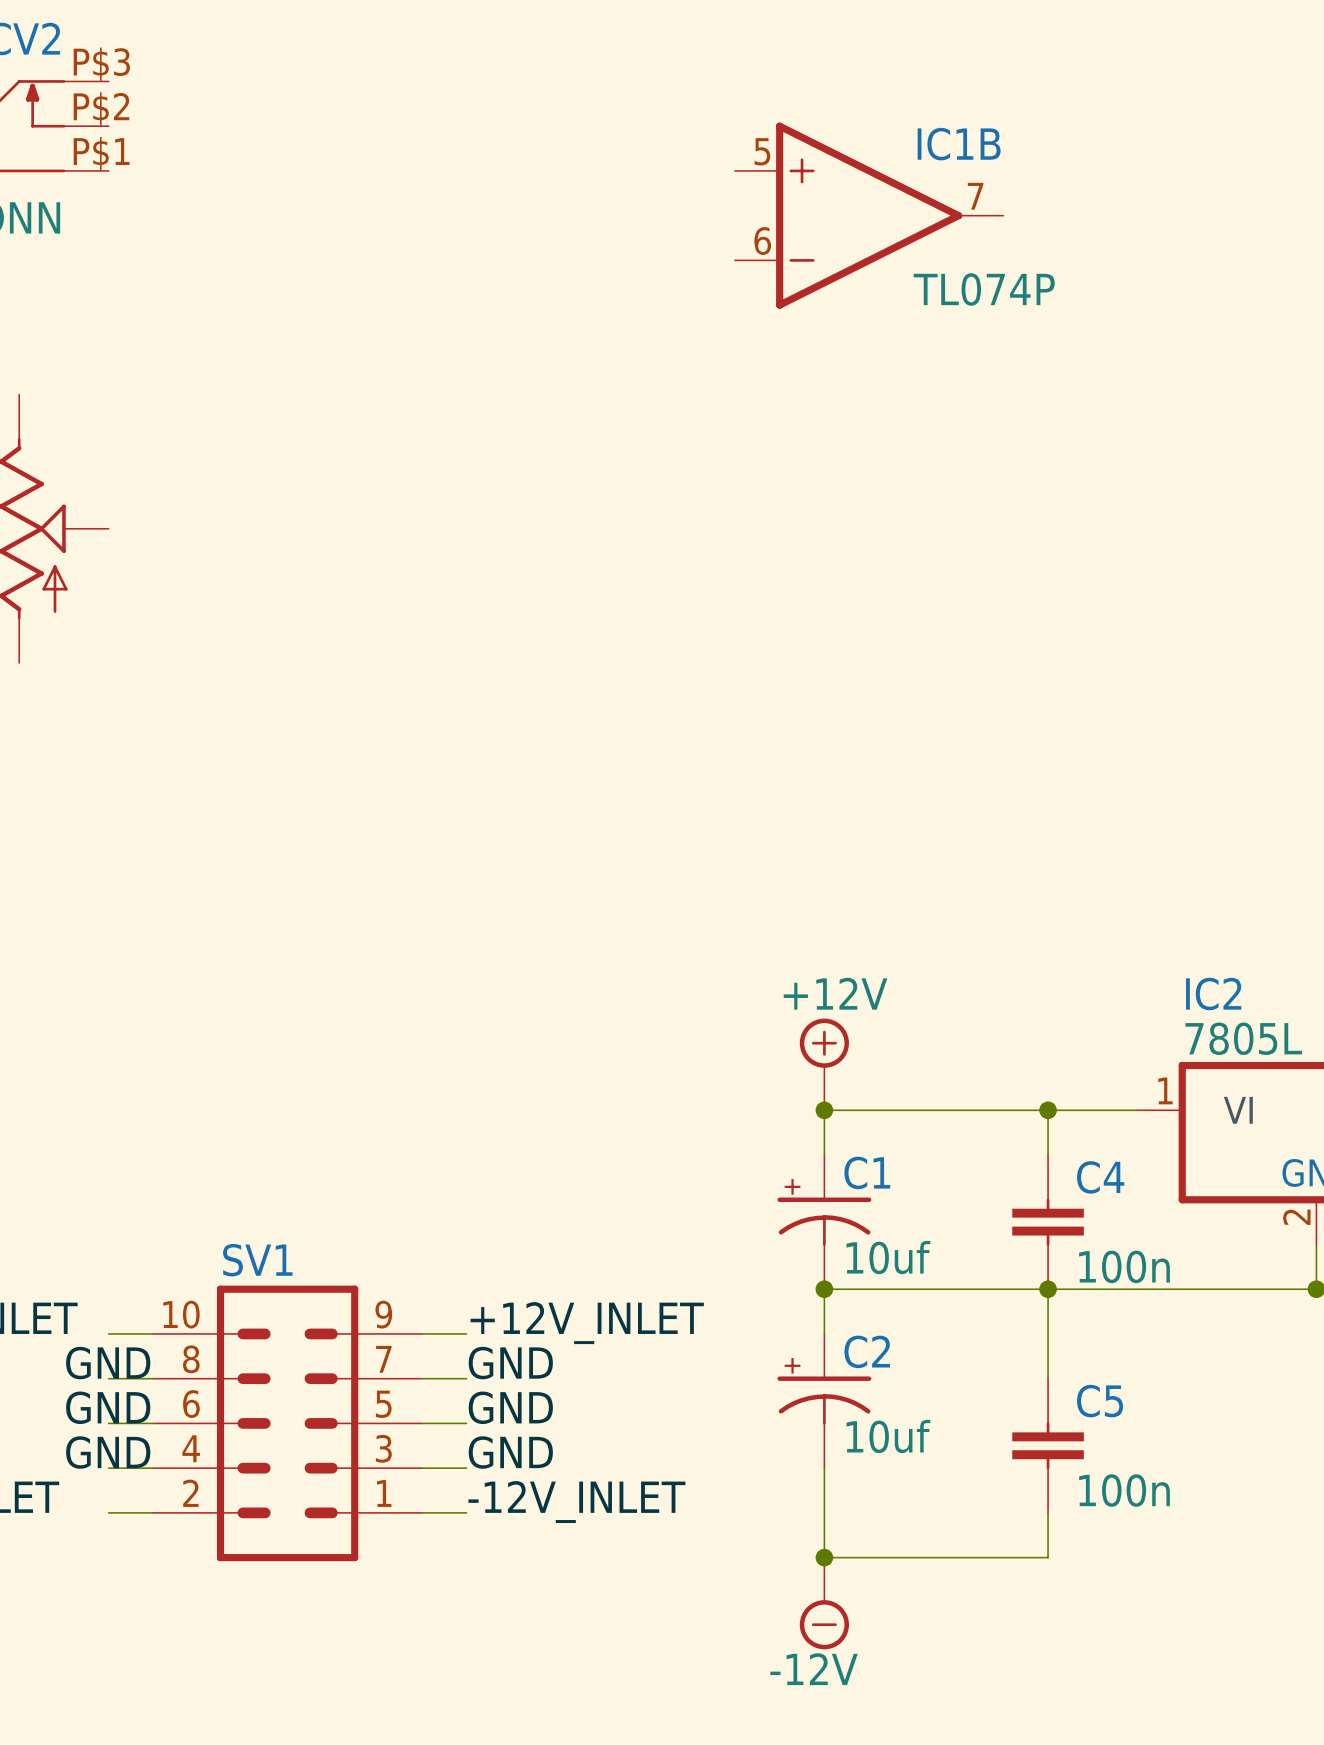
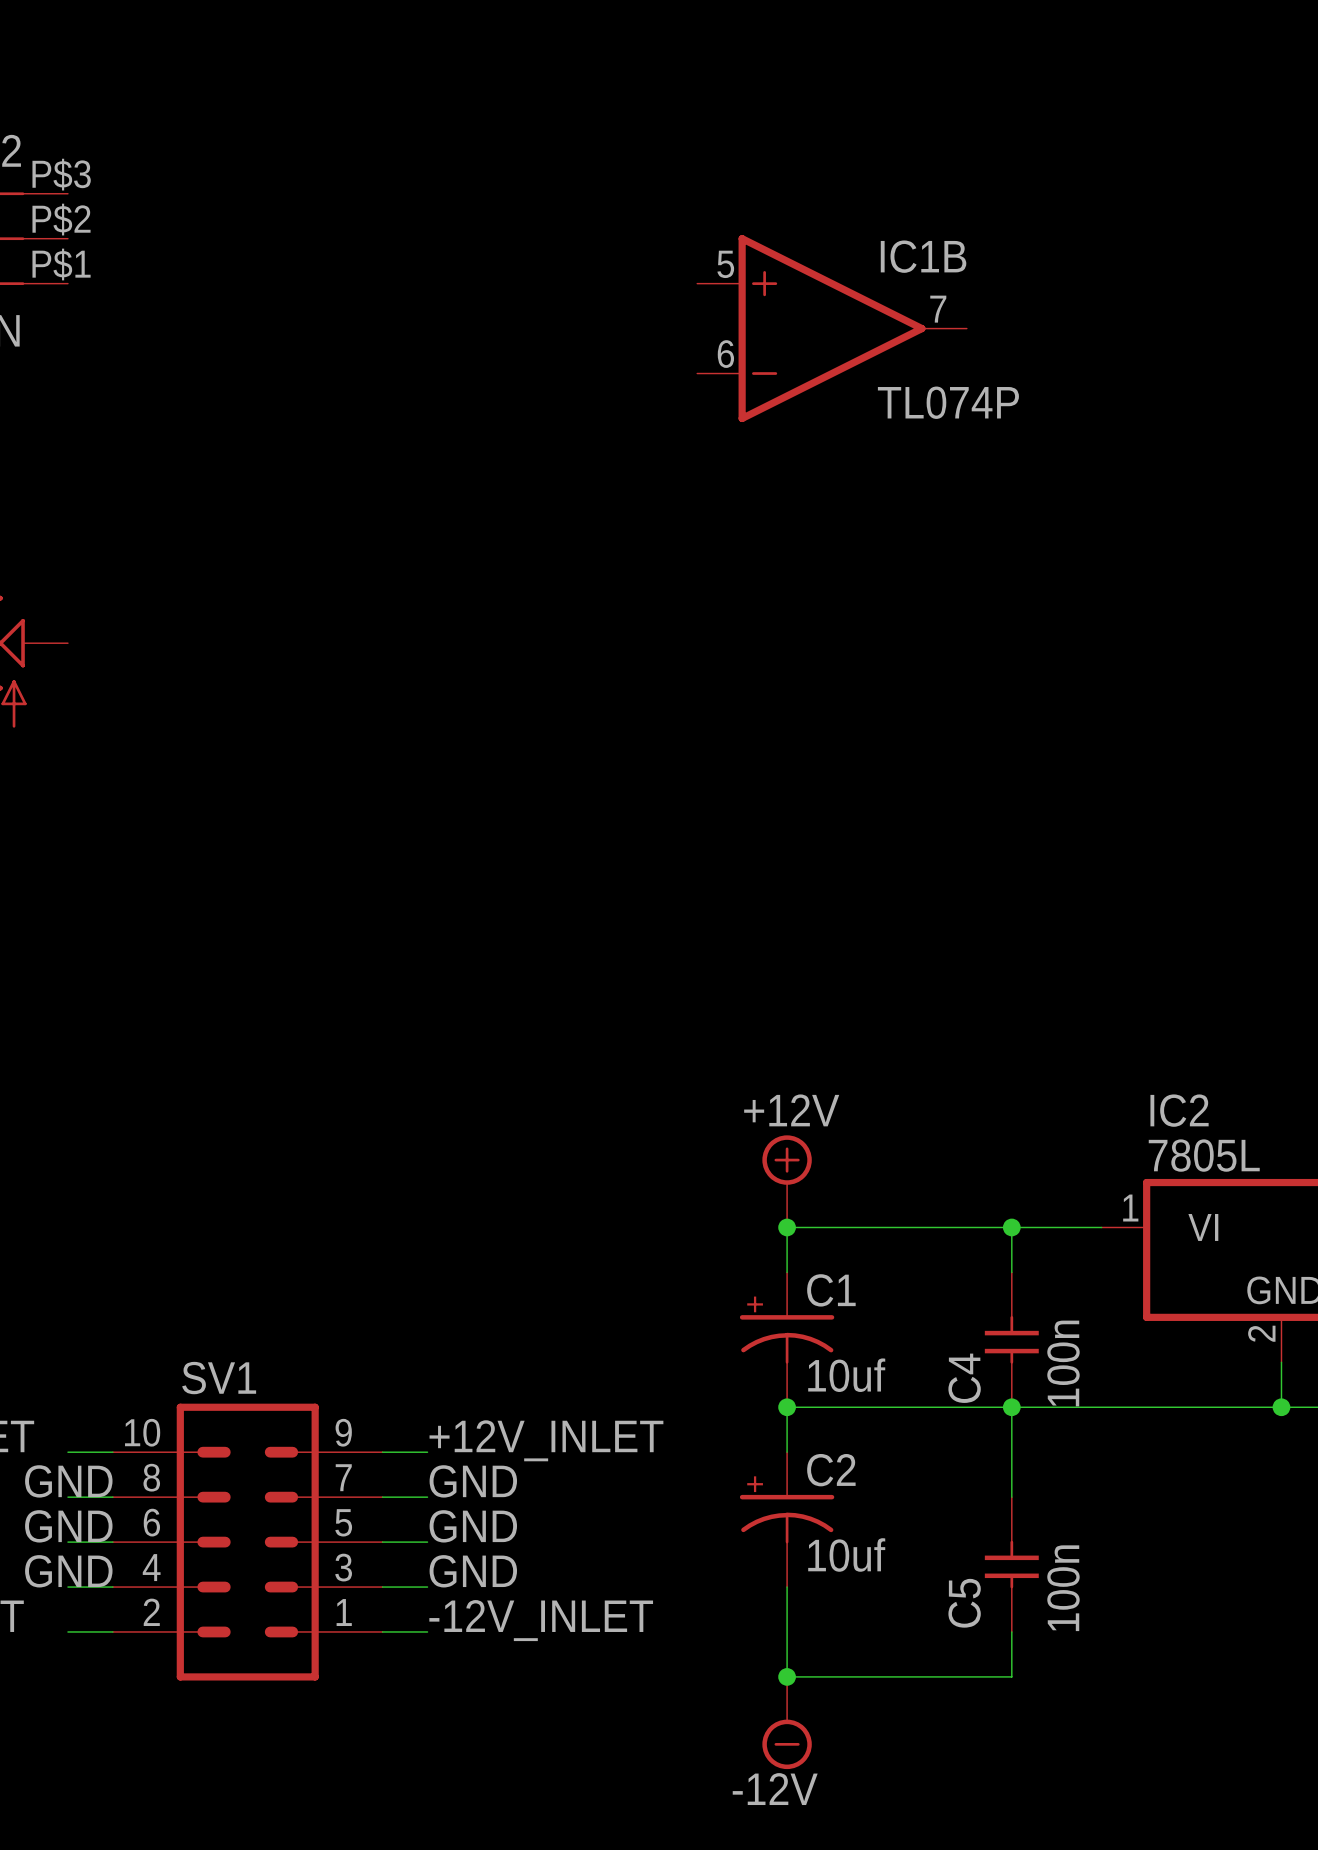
C4 symbol: [1012, 1155, 1084, 1290] -> [984, 1272, 1039, 1408]
C4 name rotation: 0° (1100, 1177) -> 90° counterclockwise (964, 1378)
C4 name position: C4 (1100, 1177) -> C4 (964, 1378)
C4 value rotation: 0° (1124, 1266) -> 90° counterclockwise (1063, 1363)
C5 symbol: [1012, 1378, 1084, 1513] -> [984, 1497, 1039, 1632]
C5 name rotation: 0° (1100, 1401) -> 90° counterclockwise (964, 1603)
C5 name position: C5 (1100, 1401) -> C5 (964, 1603)
C5 value rotation: 0° (1124, 1490) -> 90° counterclockwise (1063, 1588)

